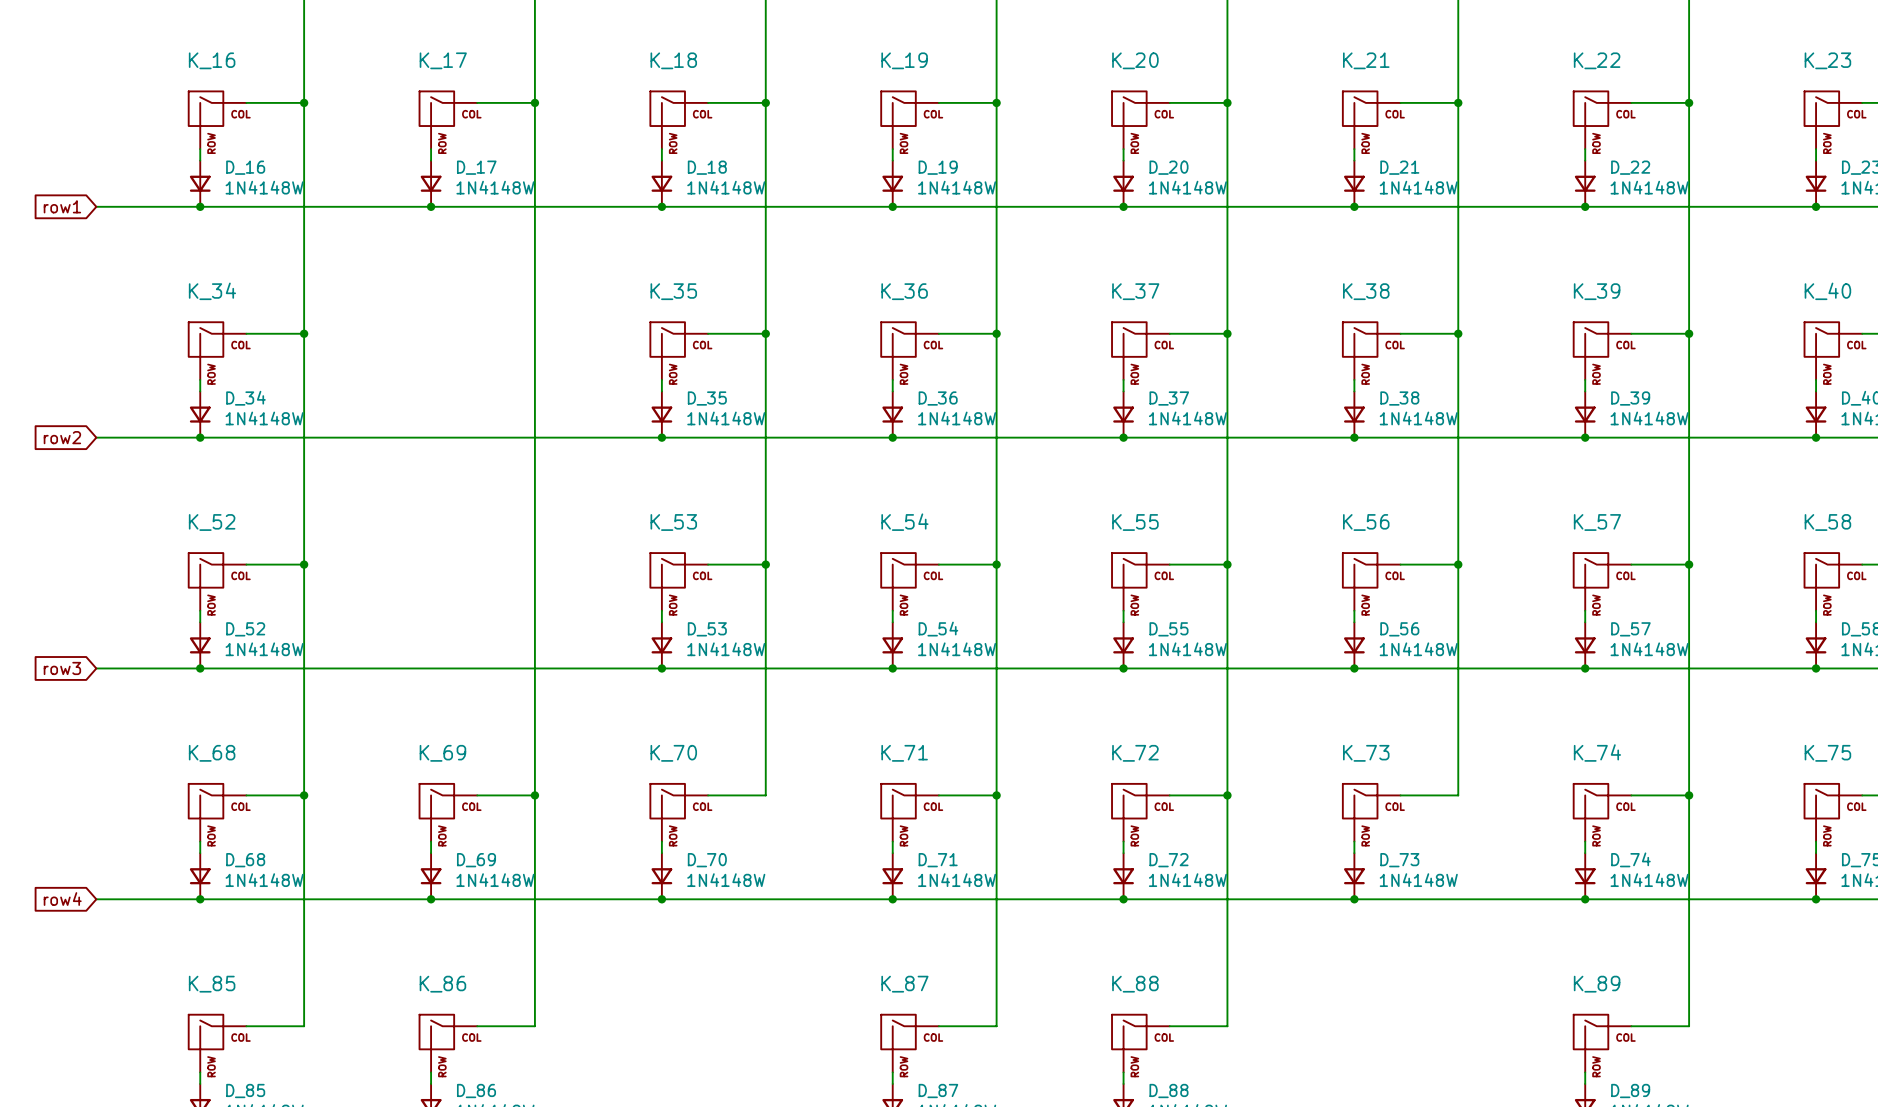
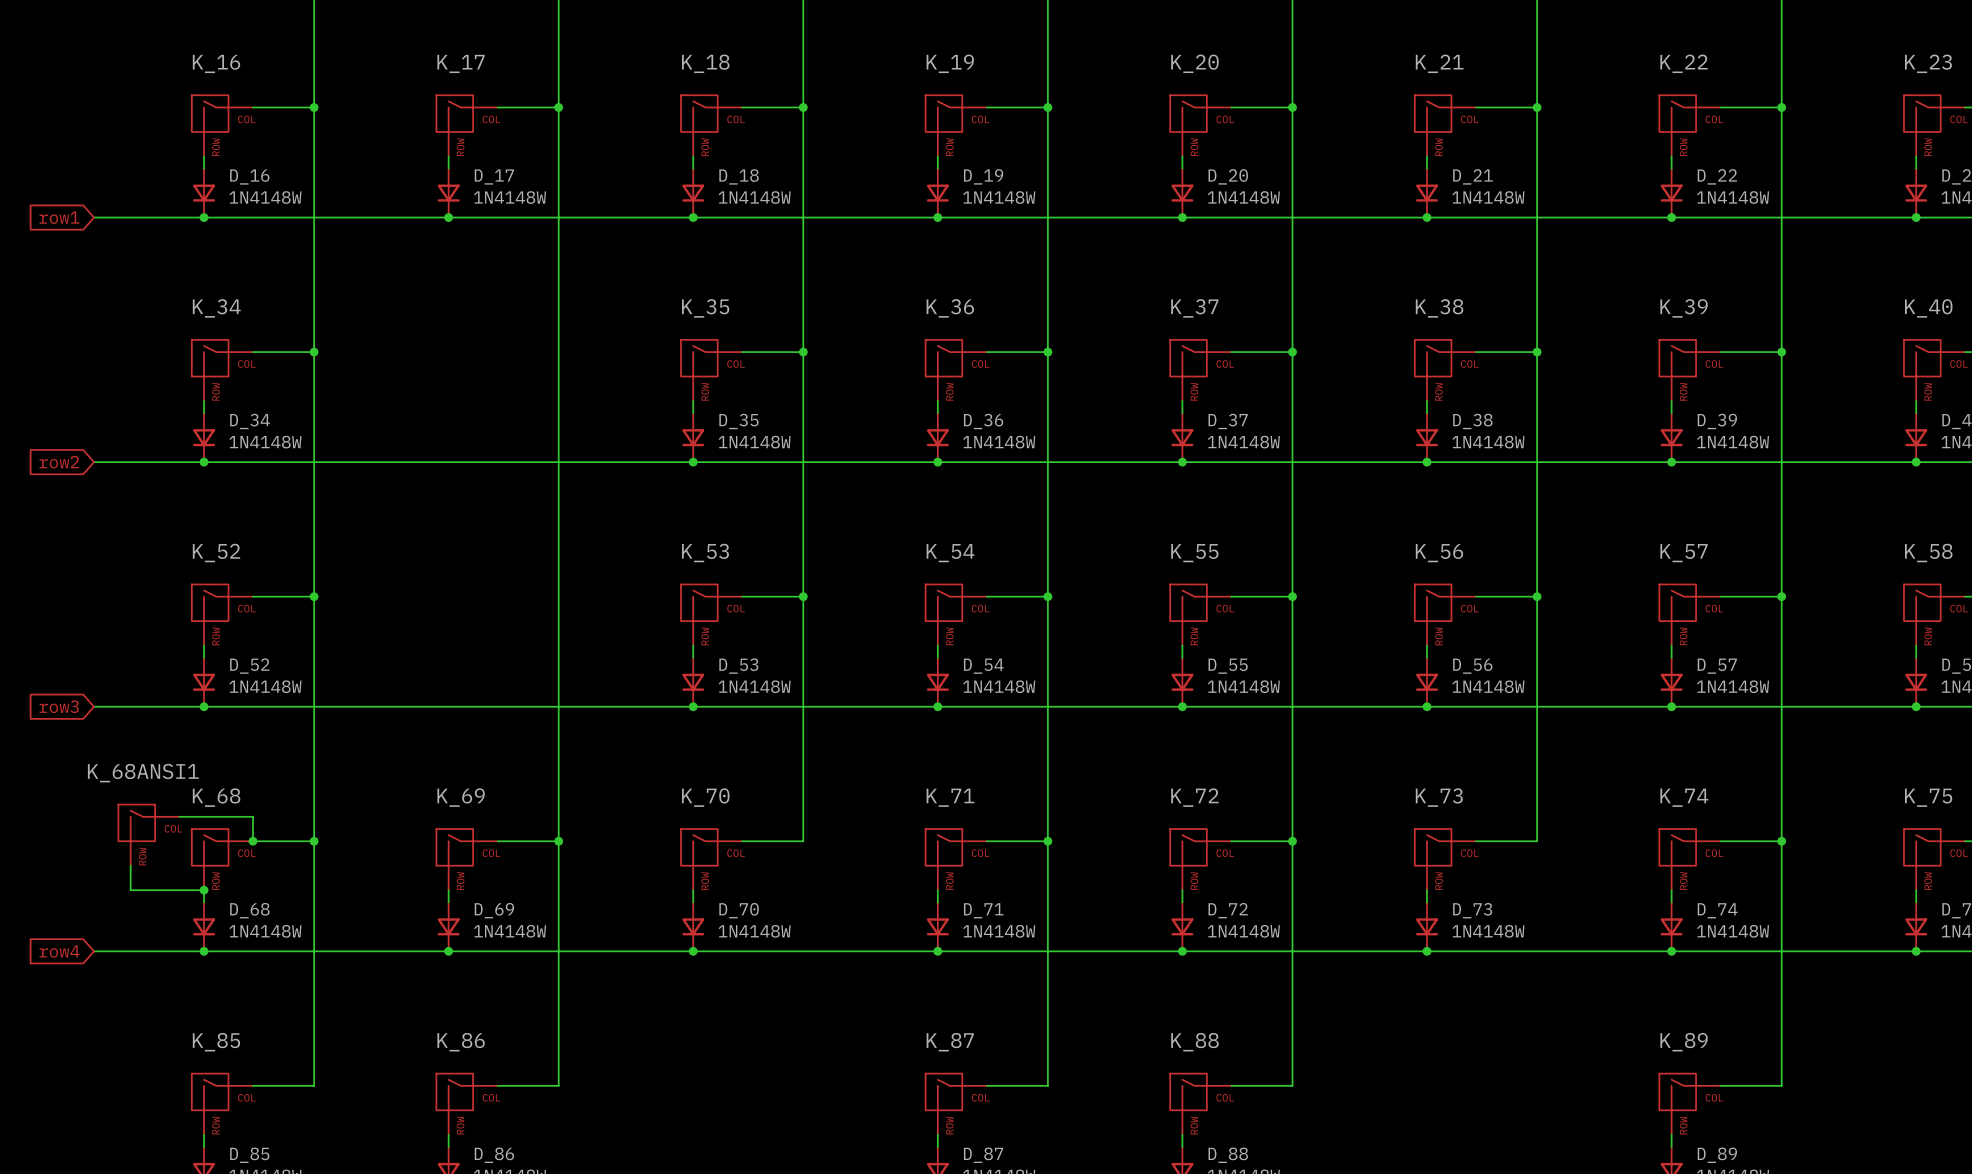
wire: none -> (179, 816) (252, 816) (252, 841)
K_68ANSI1: none -> (149, 835)
junction: none -> (252, 841)
wire: none -> (130, 865) (130, 890) (204, 890)
junction: none -> (204, 890)

